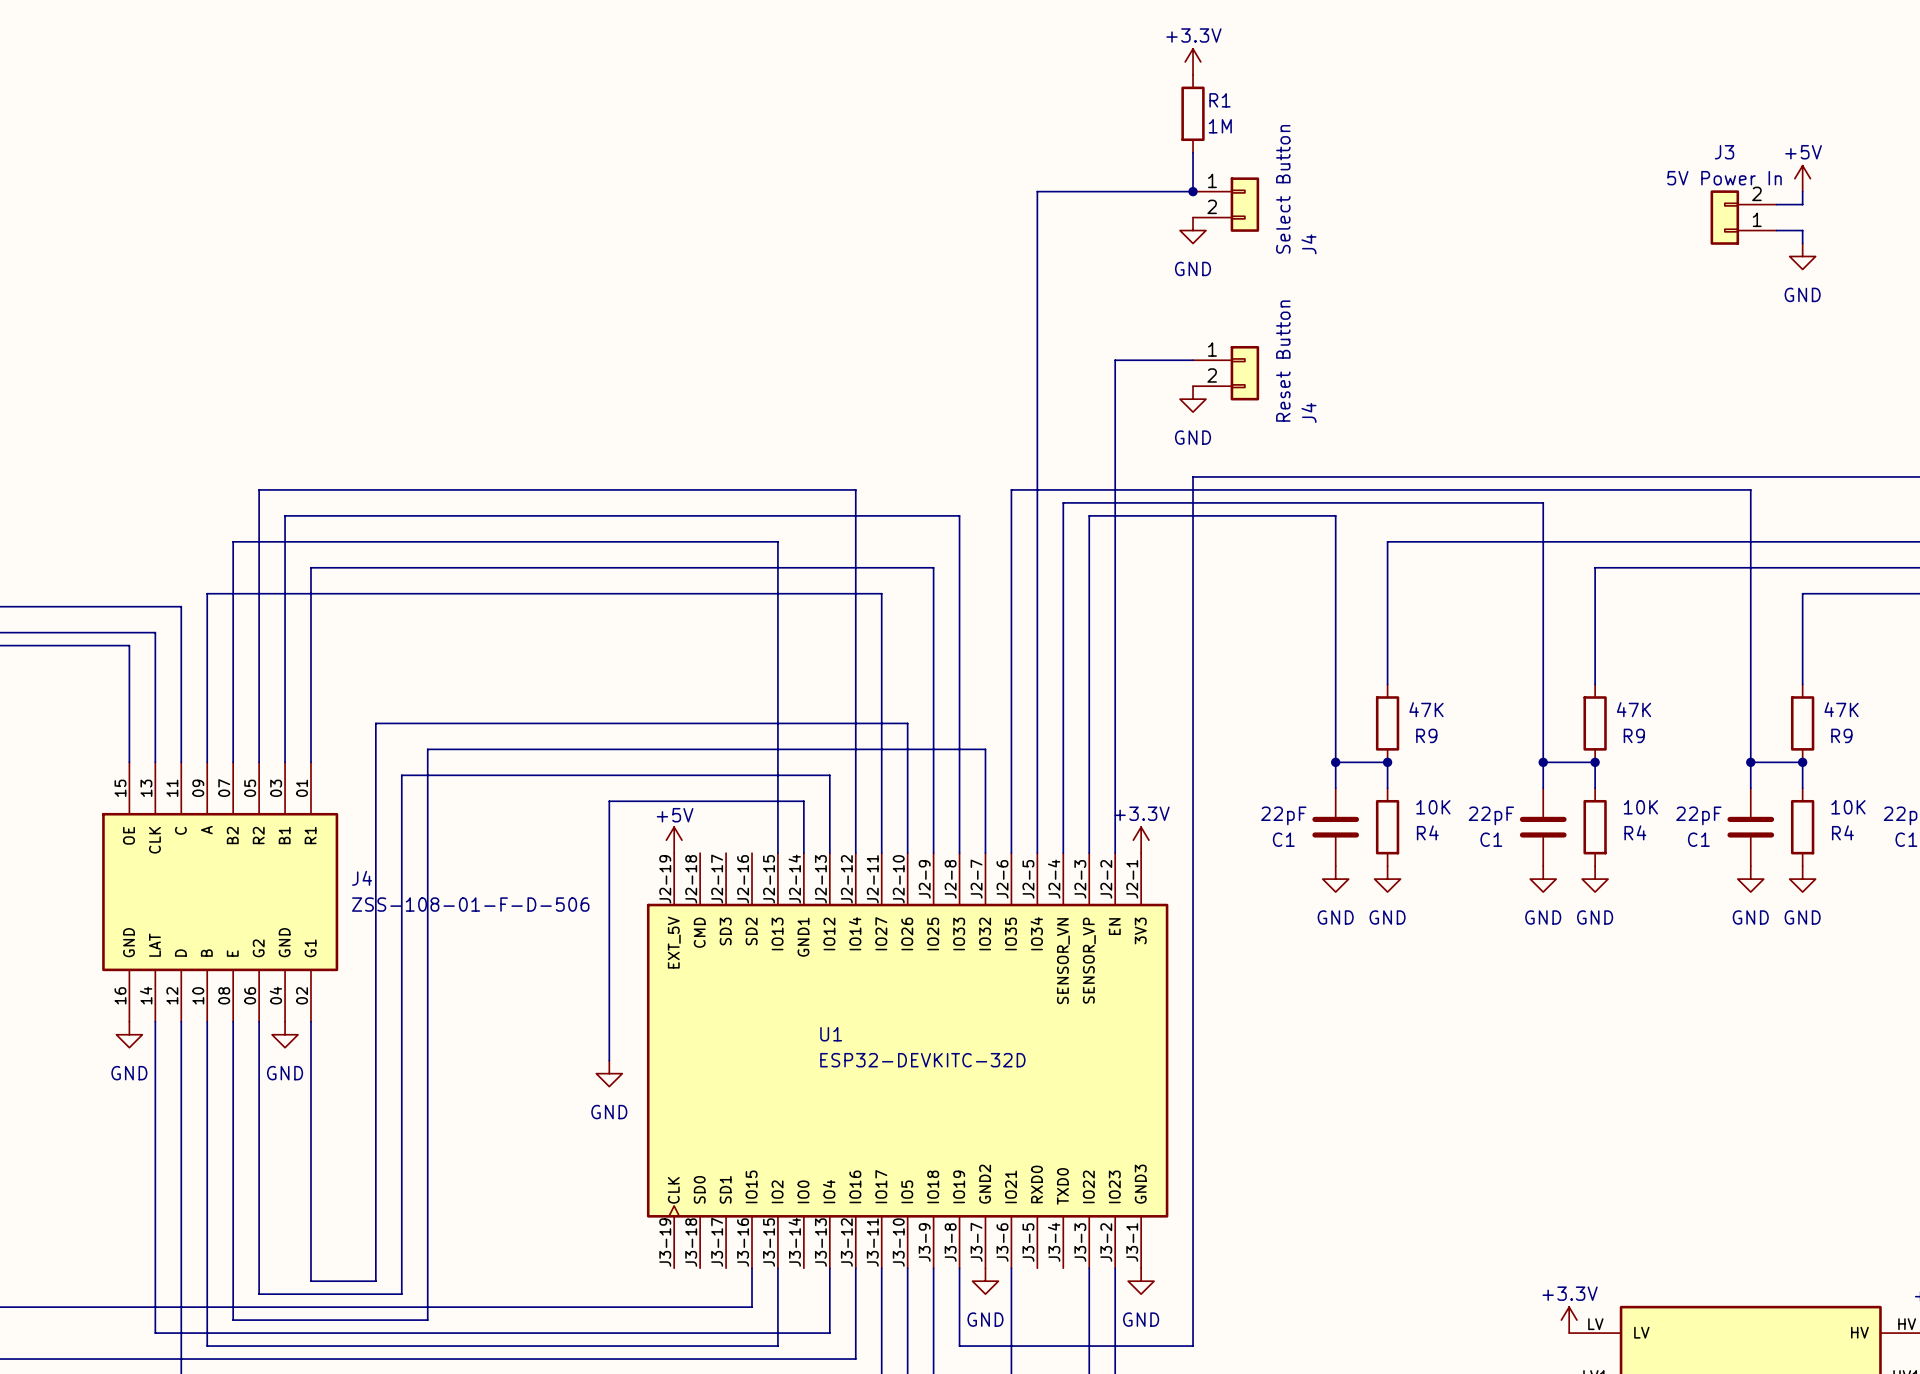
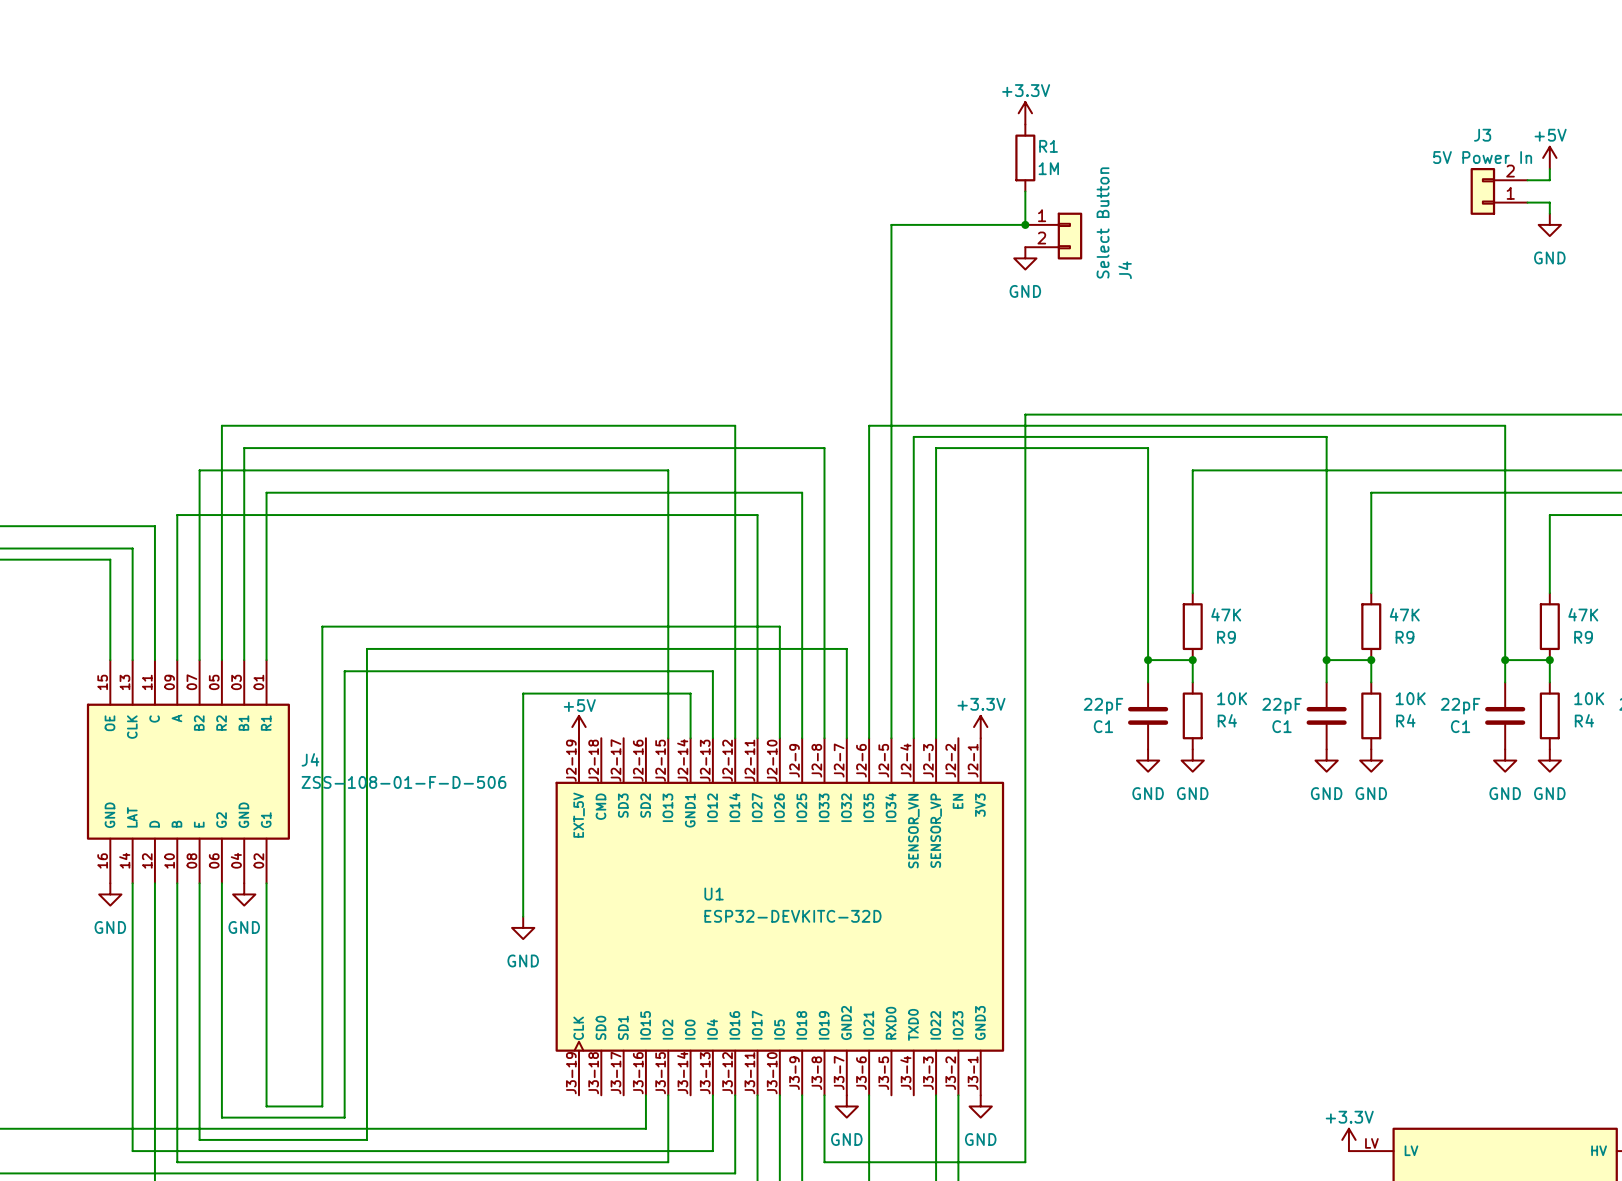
power symbol position: +3.3V (1193, 61) -> +3.3V (1025, 113)
R1 position: (1193, 113) -> (1025, 157)
wire: (1193, 152) (1193, 191) (1037, 191) (1037, 256) -> (1025, 191) (1025, 224) (891, 224)
junction: (1193, 191) -> none
J4 position: (1226, 204) -> (1053, 236)
power symbol: GND (1193, 230) -> none
junction: none -> (1025, 224)
power symbol: none -> GND (1025, 258)
wire: (1193, 360) (1115, 360) (1115, 853) -> none
J4: Reset Button (1226, 373) -> none
power symbol: GND (1193, 399) -> none

